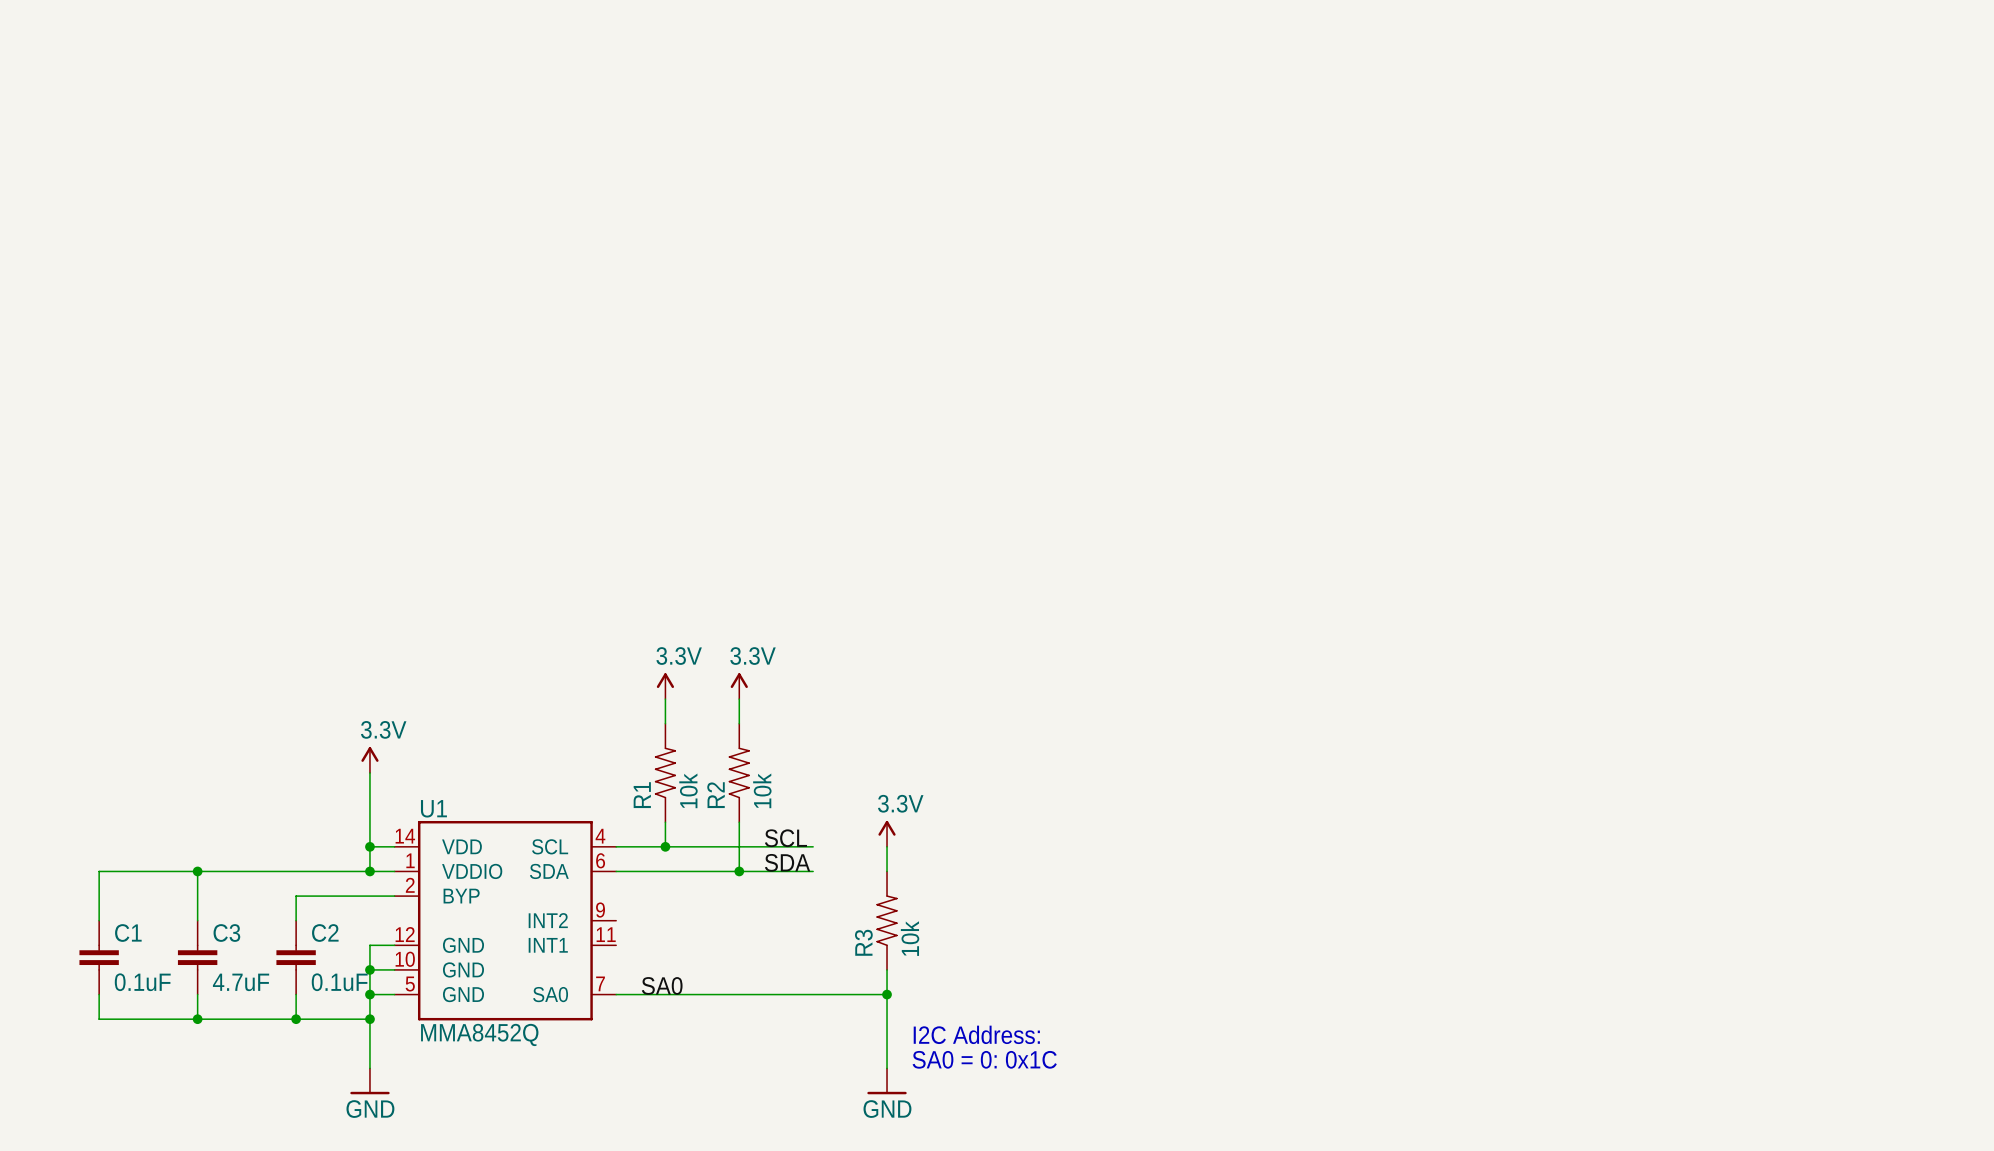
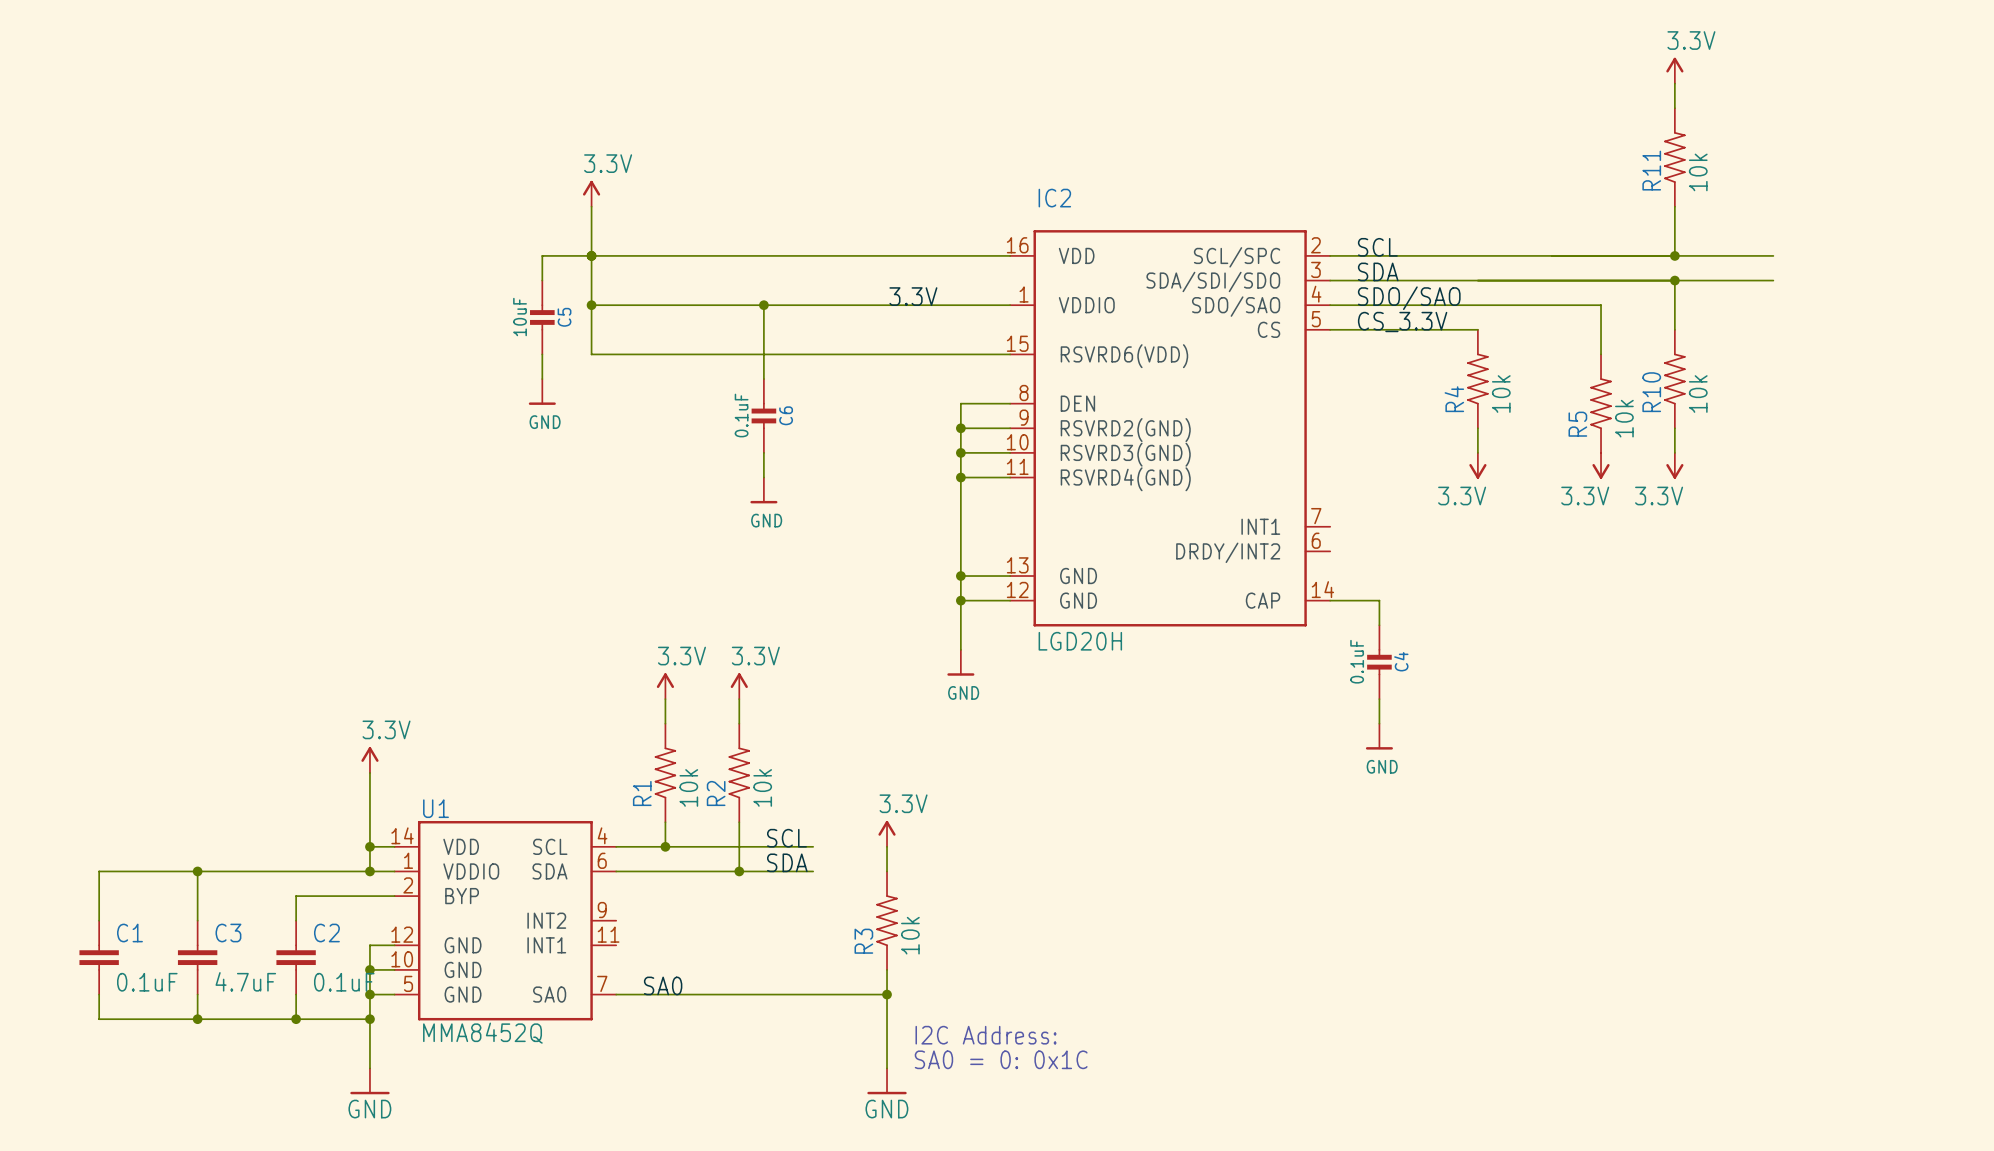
power symbol: none -> 3.3V (1674, 70)
wire: none -> (1674, 83) (1674, 108)
R11: none -> 10k (1674, 157)
power symbol: none -> 3.3V (591, 193)
wire: none -> (591, 206) (591, 354) (1010, 354)
wire: none -> (1674, 206) (1674, 255)
label: none -> SCL (1377, 247)
junction: none -> (591, 255)
wire: none -> (1010, 255) (542, 255) (542, 280)
wire: none -> (1330, 255) (1773, 255)
junction: none -> (1674, 255)
label: none -> SDA (1378, 271)
wire: none -> (1330, 280) (1773, 280)
wire: none -> (1674, 280) (1674, 329)
junction: none -> (1674, 280)
label: none -> 3.3V (913, 296)
label: none -> SDO/SAO (1409, 298)
wire: none -> (591, 305) (1010, 305)
junction: none -> (591, 305)
wire: none -> (763, 305) (763, 379)
junction: none -> (763, 305)
wire: none -> (1330, 305) (1601, 305) (1601, 354)
C5: none -> 10uF (542, 317)
label: none -> CS_3.3V (1402, 322)
wire: none -> (1330, 329) (1477, 329)
wire: none -> (542, 354) (542, 379)
R4: none -> 10k (1477, 379)
R10: none -> 10k (1674, 379)
power symbol: none -> GND (542, 391)
wire: none -> (1010, 403) (960, 403) (960, 649)
R5: none -> 10k (1601, 403)
C6: none -> 0.1uF (763, 415)
wire: none -> (960, 428) (1010, 428)
junction: none -> (960, 428)
IC2: none -> LGD20H (1170, 428)
wire: none -> (1477, 428) (1477, 452)
wire: none -> (1674, 428) (1674, 452)
wire: none -> (763, 452) (763, 477)
wire: none -> (960, 452) (1010, 452)
junction: none -> (960, 452)
power symbol: none -> 3.3V (1477, 465)
power symbol: none -> 3.3V (1601, 465)
power symbol: none -> 3.3V (1674, 465)
wire: none -> (960, 477) (1010, 477)
junction: none -> (960, 477)
power symbol: none -> GND (763, 490)
wire: none -> (960, 576) (1010, 576)
junction: none -> (960, 576)
wire: none -> (960, 600) (1010, 600)
junction: none -> (960, 600)
wire: none -> (1330, 600) (1379, 600) (1379, 625)
power symbol: none -> GND (960, 662)
C4: none -> 0.1uF (1379, 662)
wire: none -> (1379, 699) (1379, 723)
power symbol: none -> GND (1379, 736)

